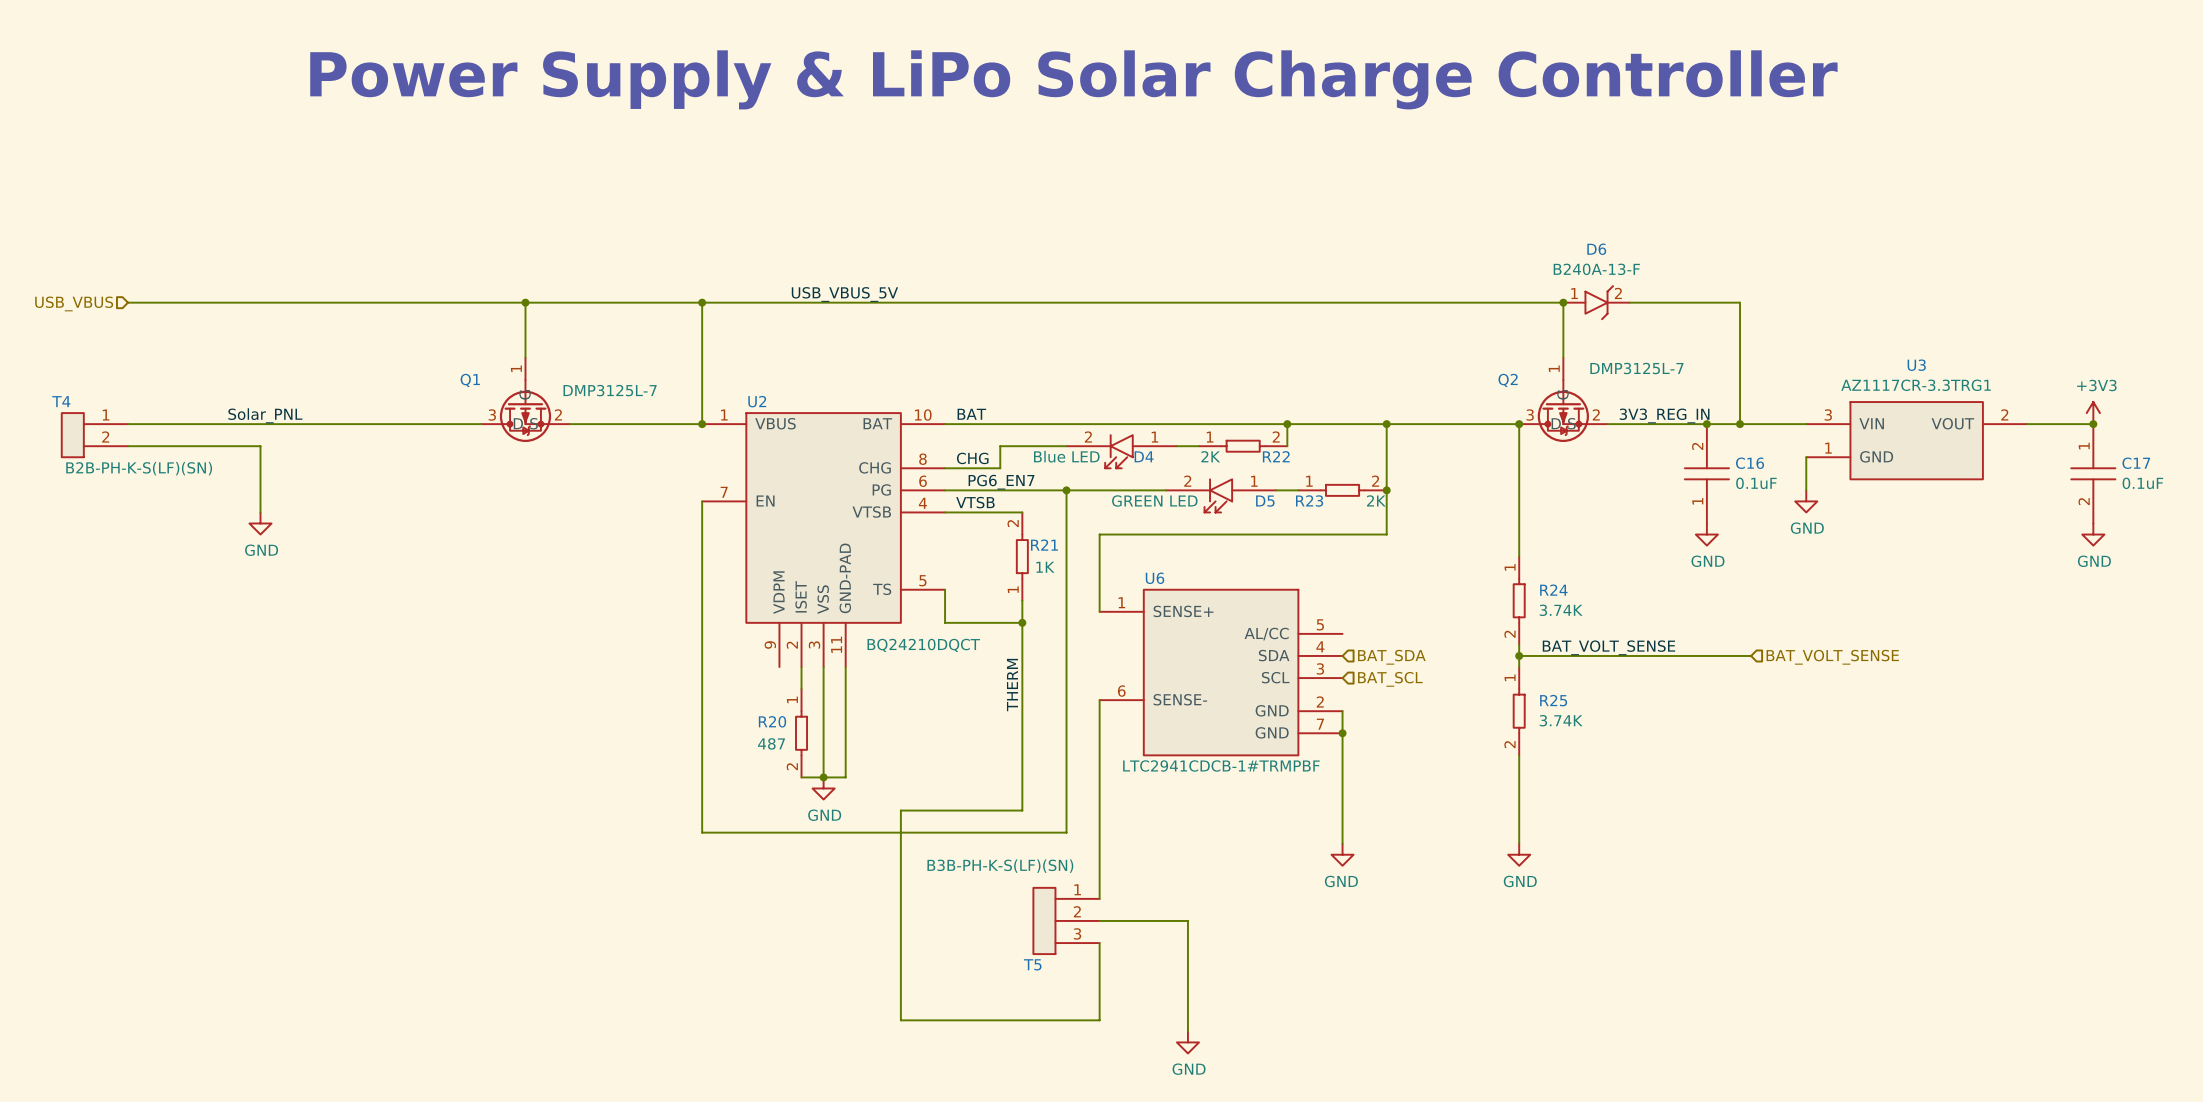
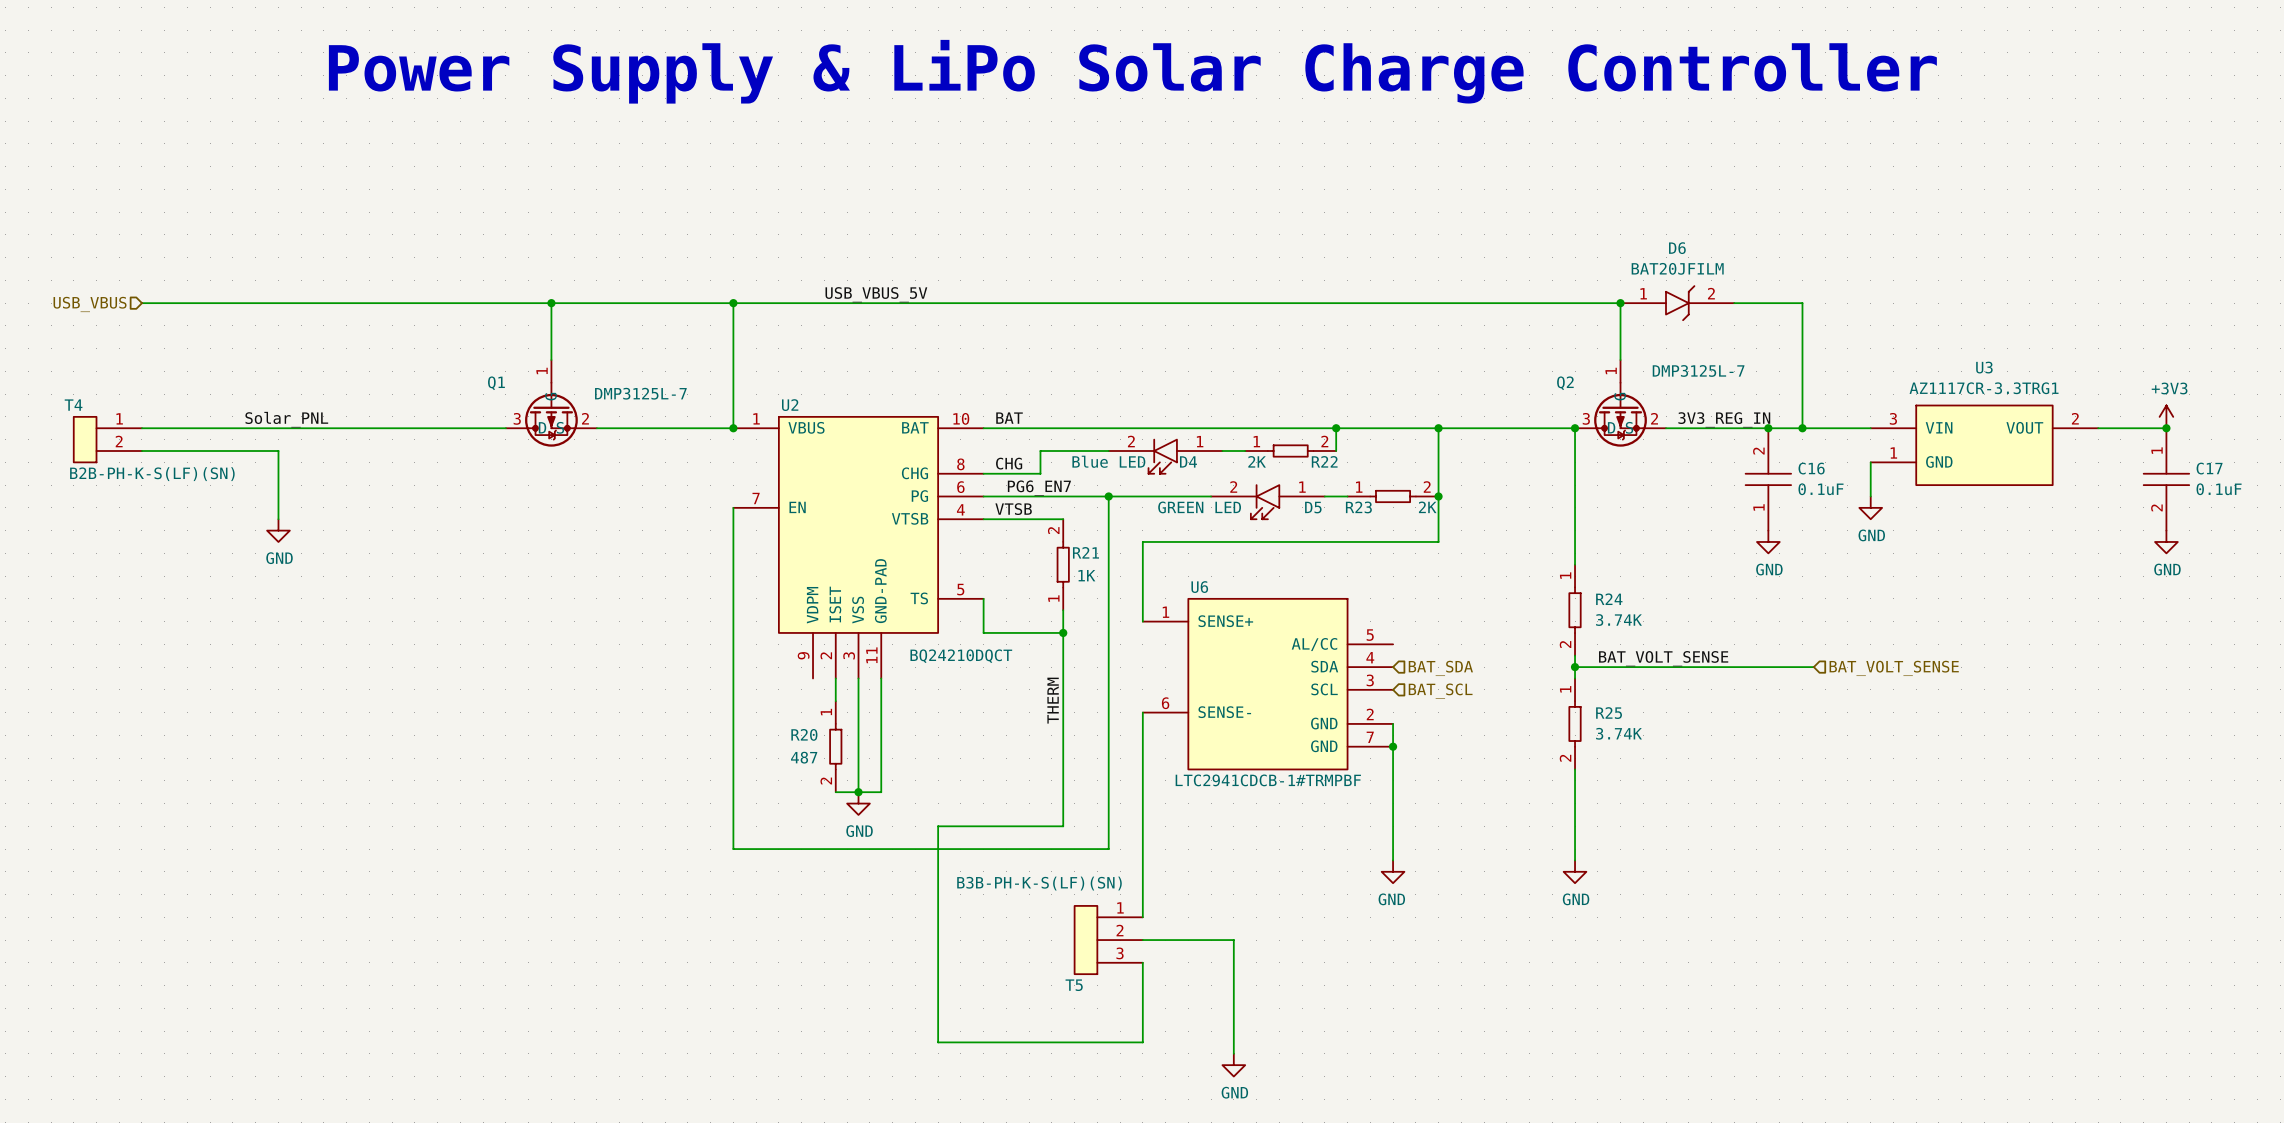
D6 text: B240A-13-F (1596, 269) -> BAT20JFILM (1677, 268)
D6 symbol: [1563, 286, 1630, 320] -> [1620, 286, 1735, 321]

